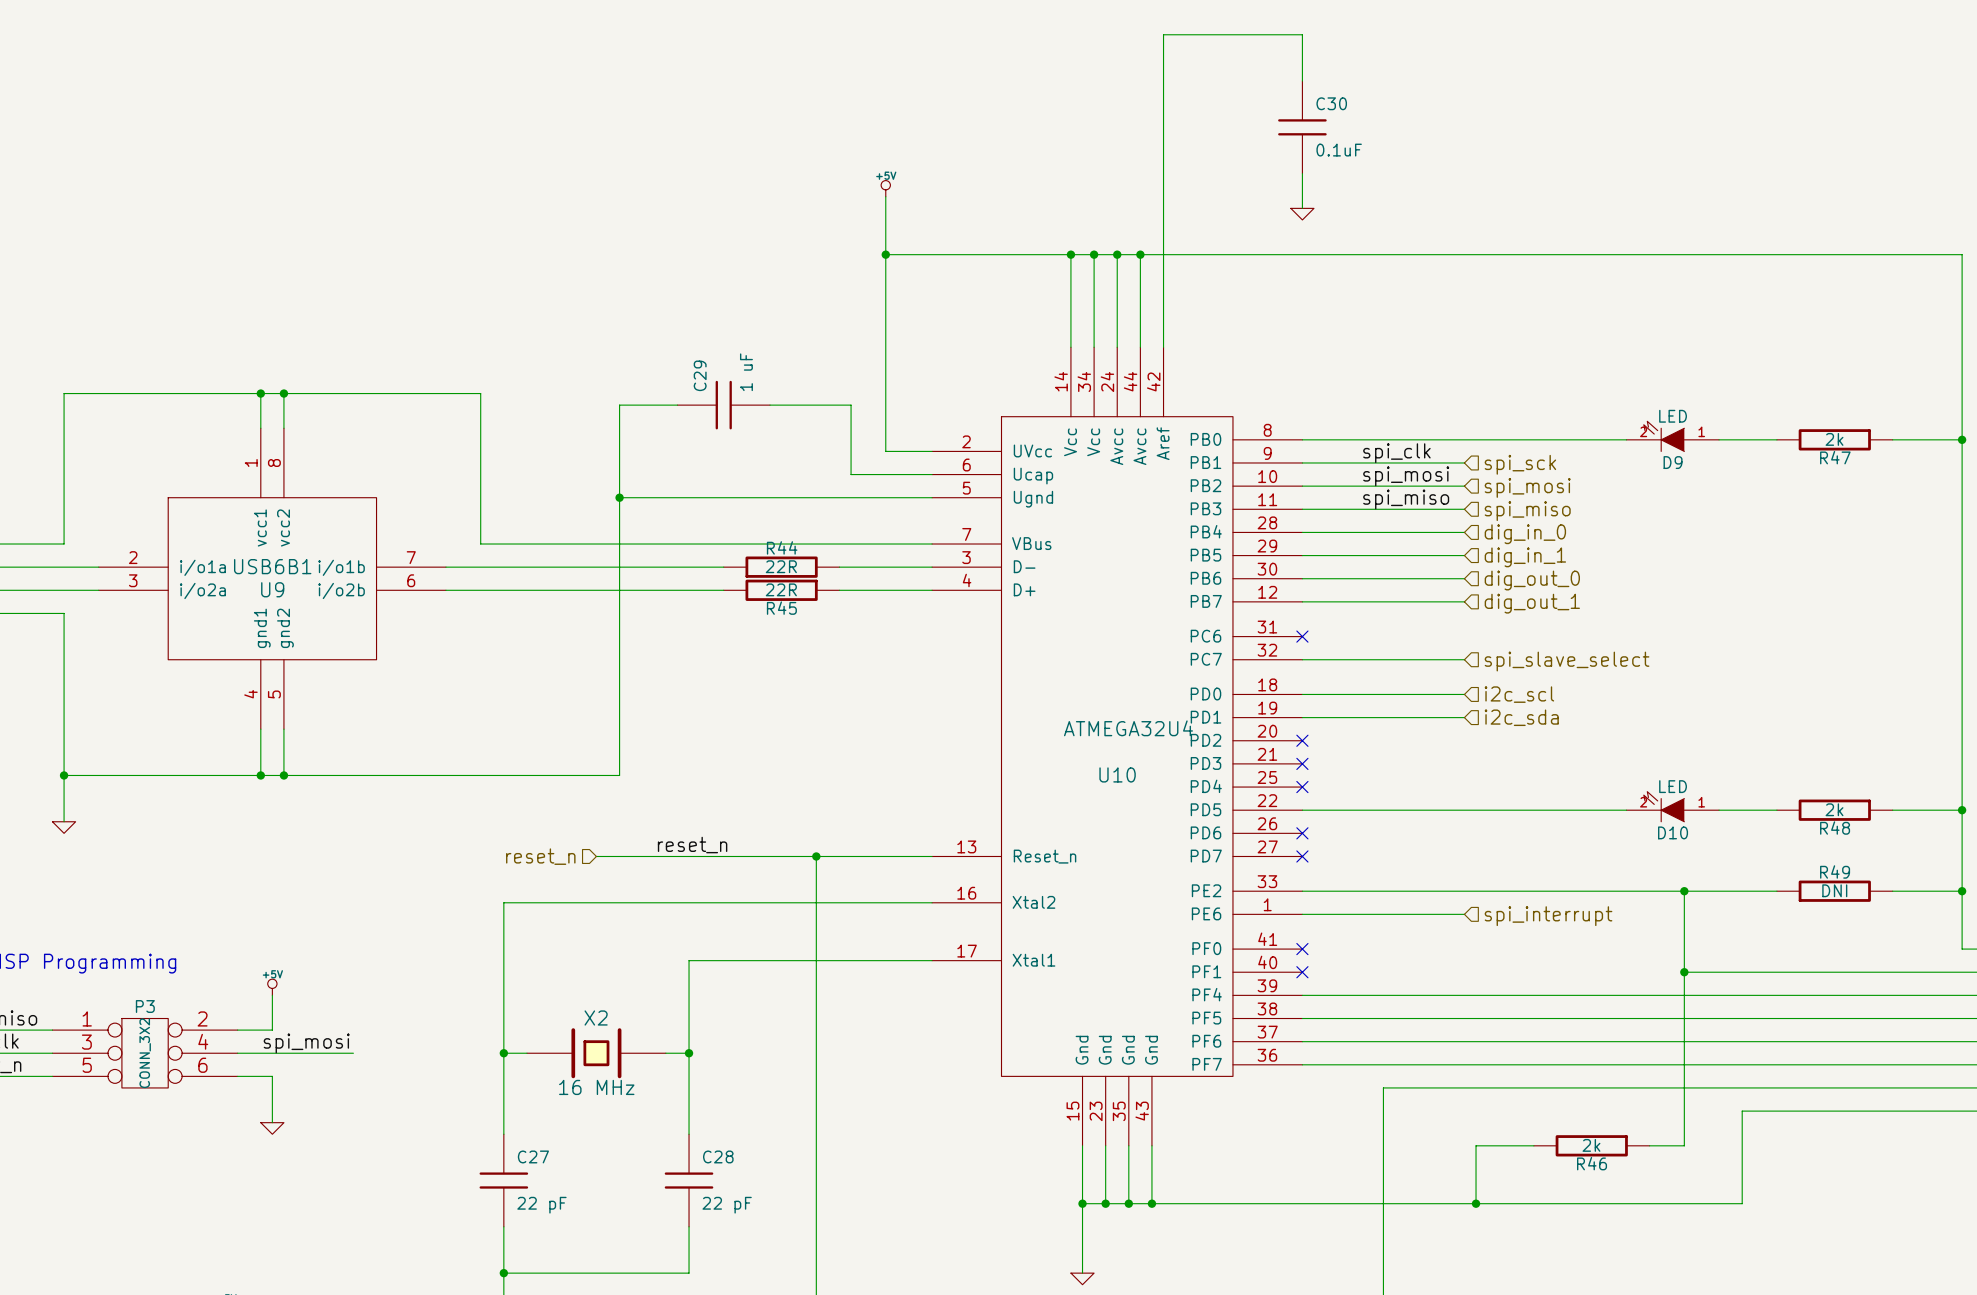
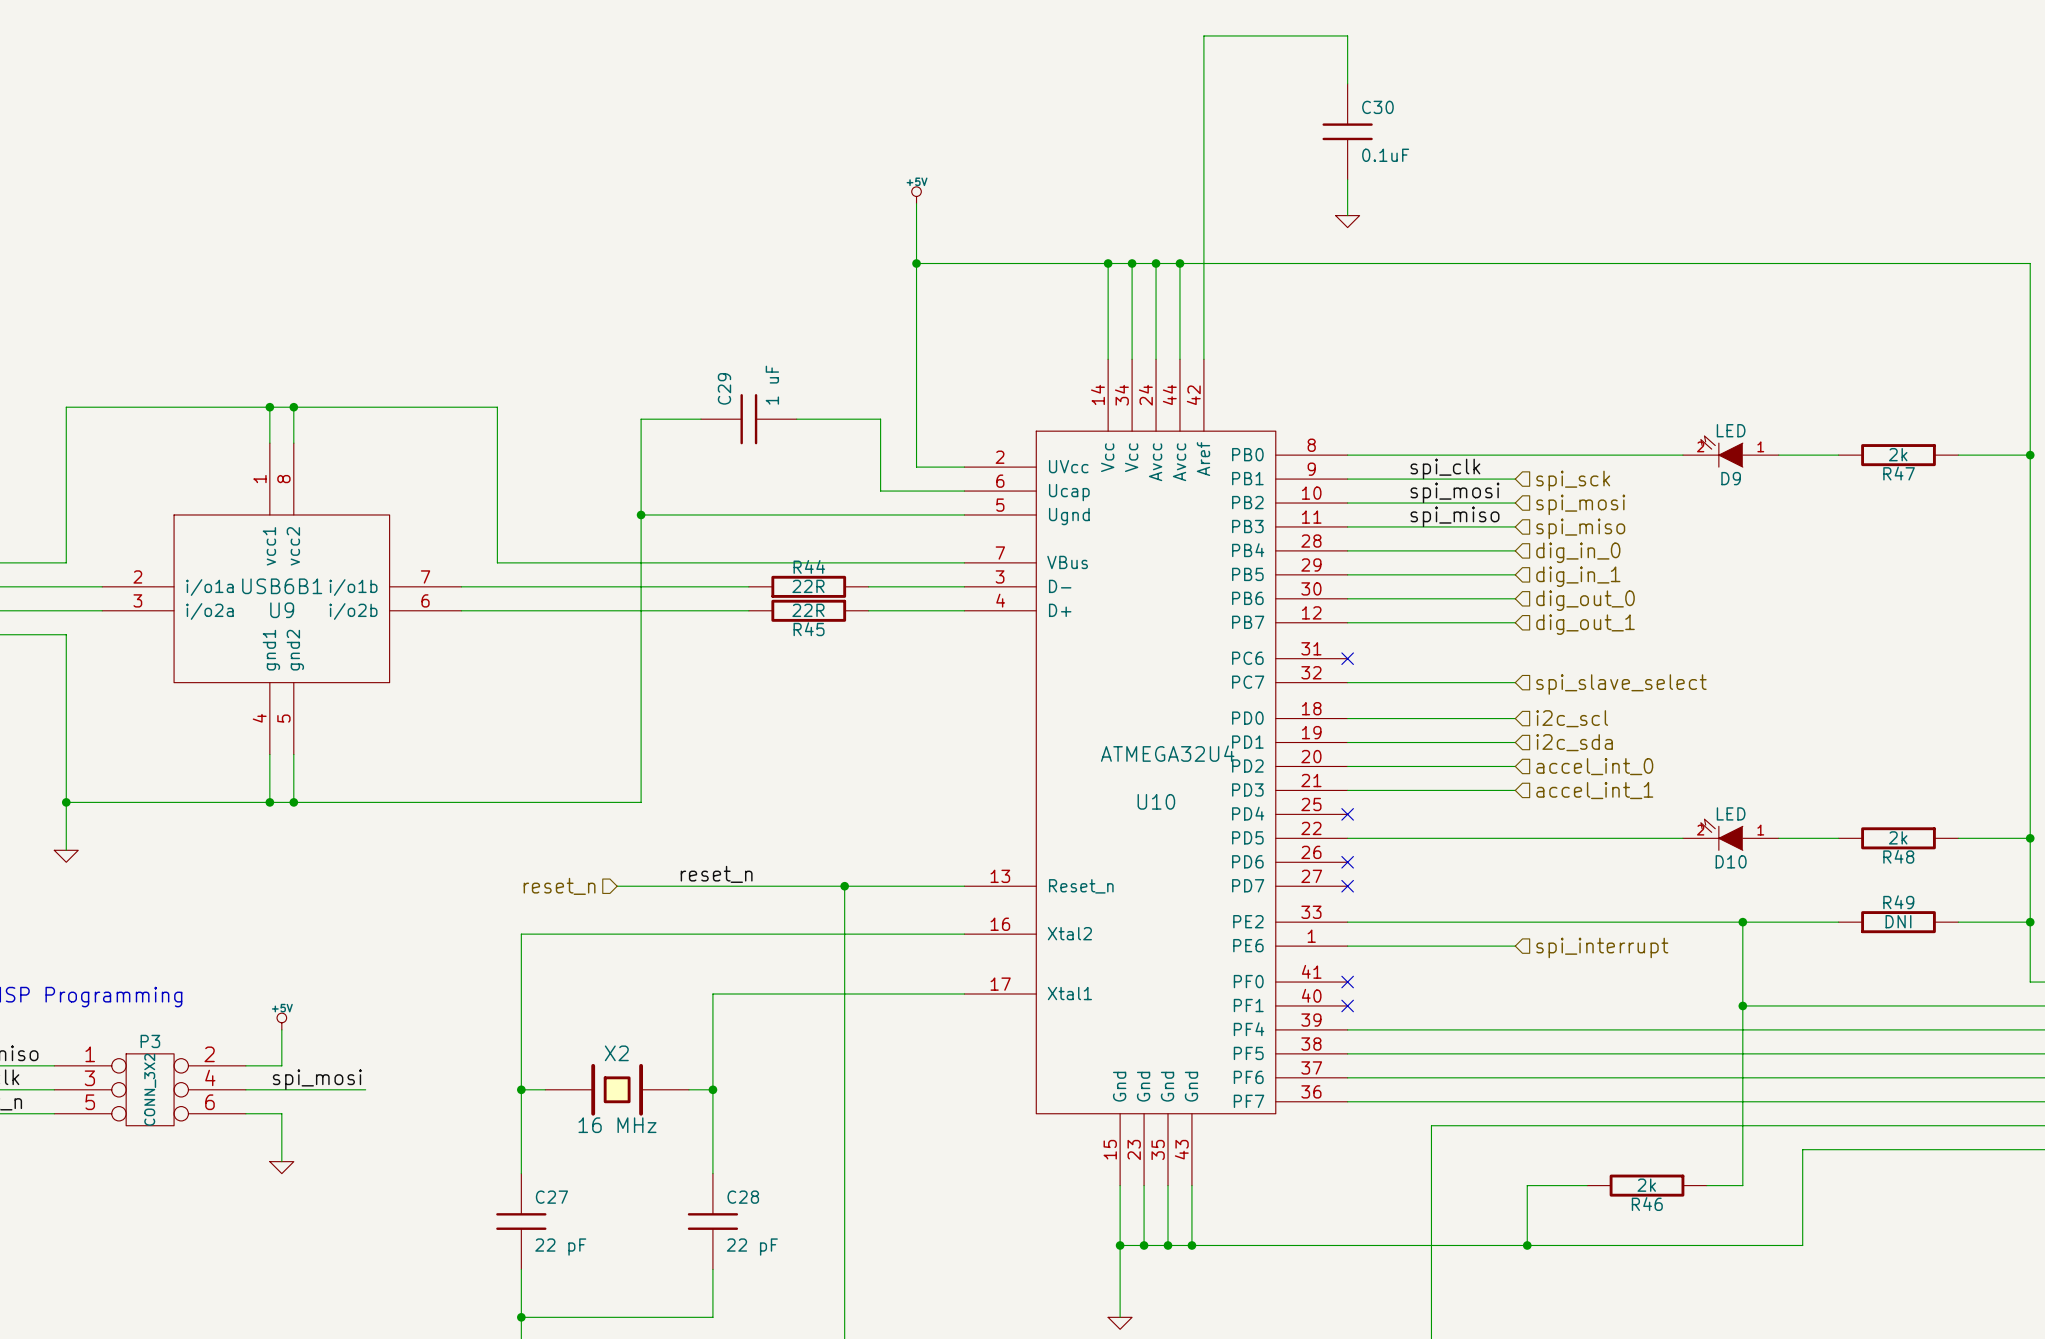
wire: none -> (1347, 766) (1515, 766)
no-connect mark: (1302, 740) -> none
hierarchical label: none -> accel_int_0 (1594, 766)
wire: none -> (1347, 790) (1515, 790)
no-connect mark: (1302, 763) -> none
hierarchical label: none -> accel_int_1 (1594, 790)

